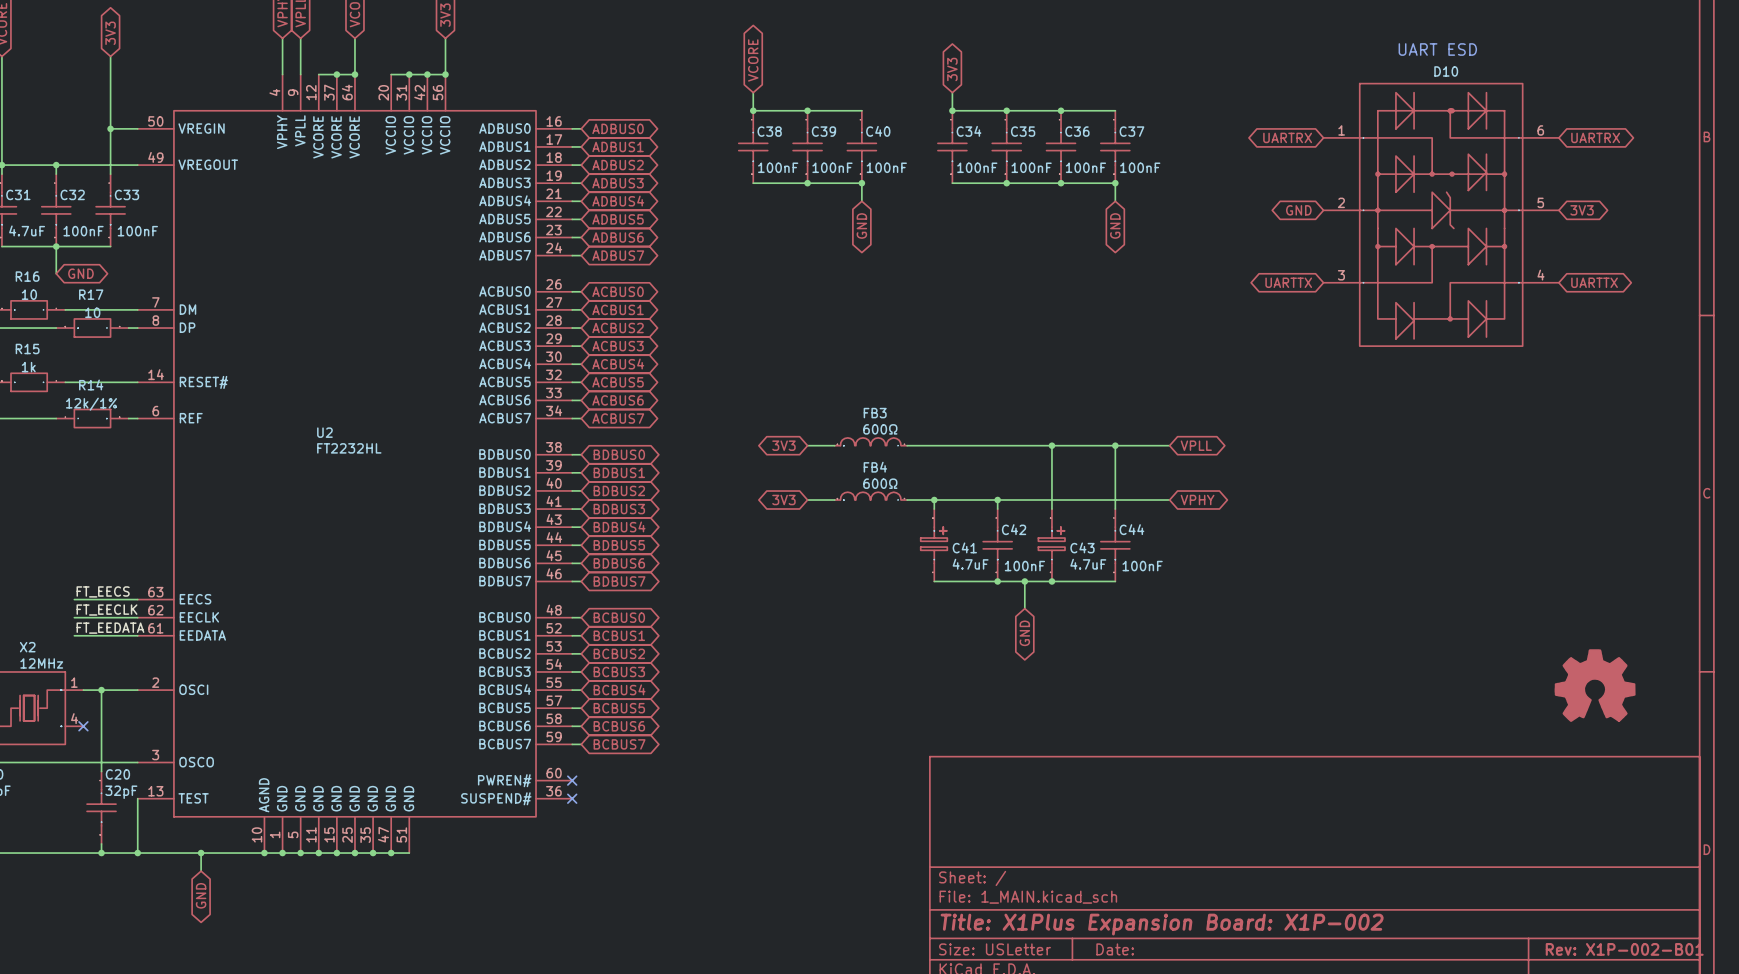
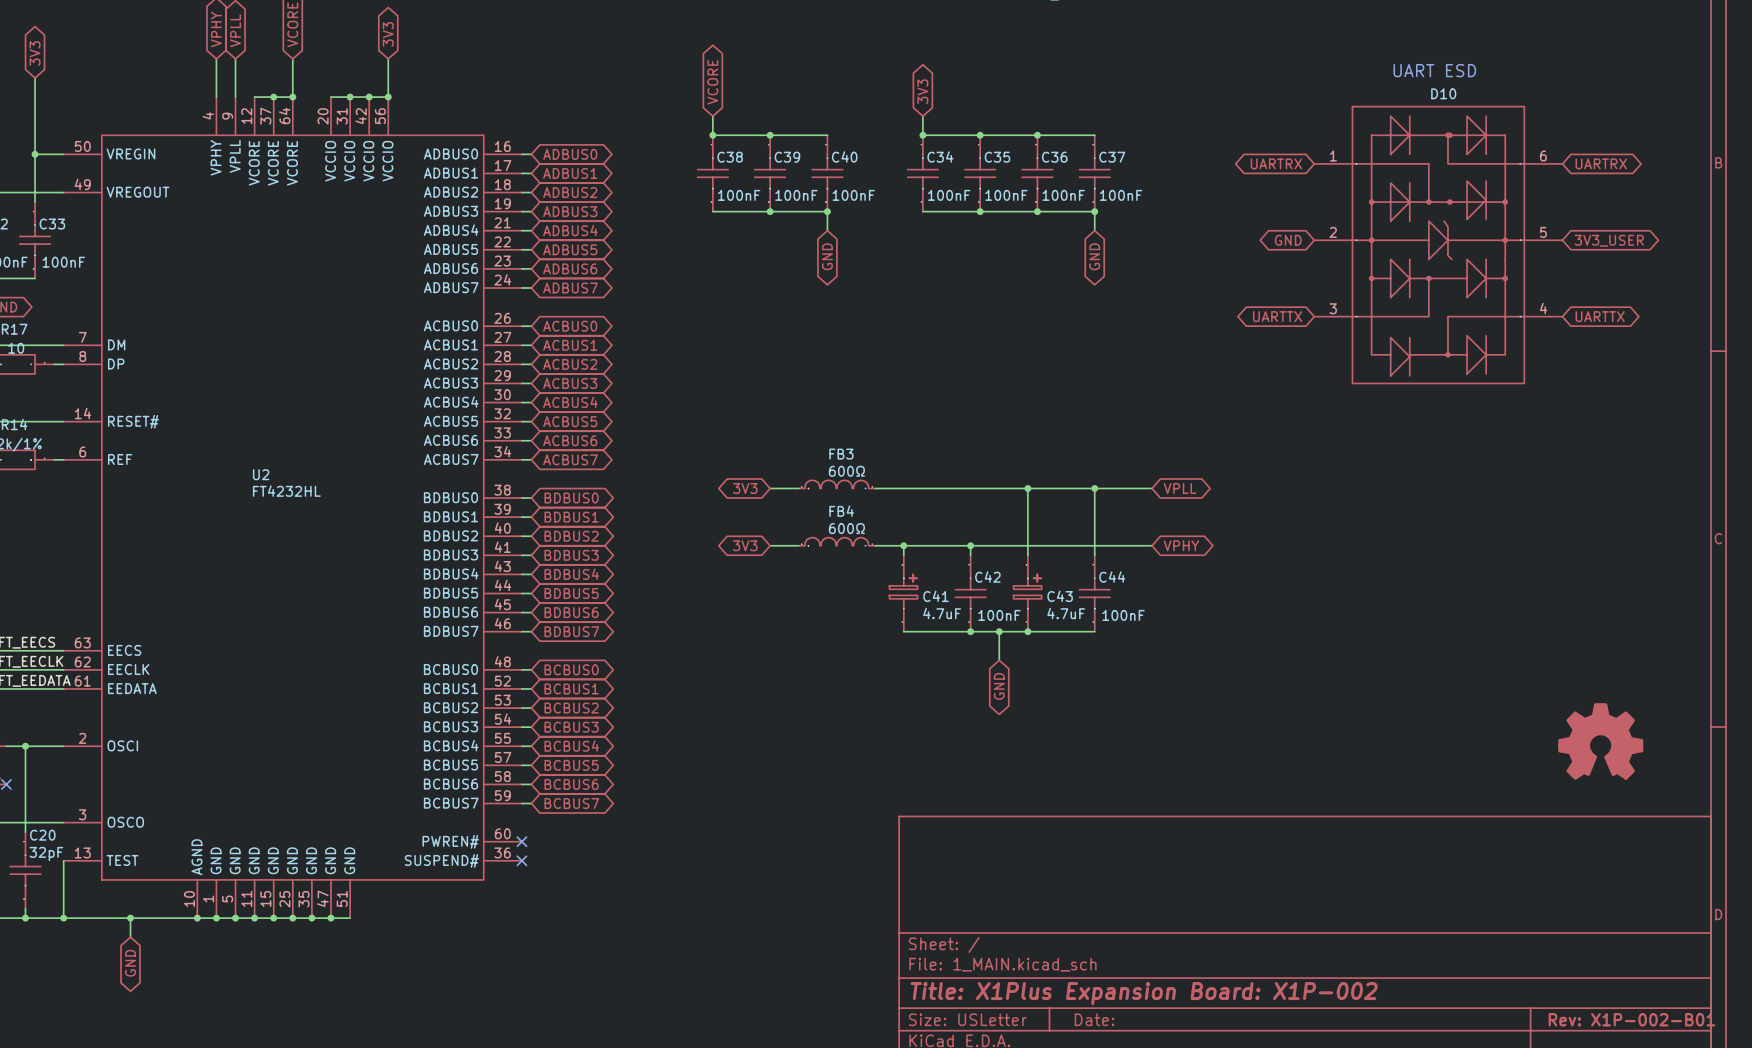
global label: 3V3 (1582, 210) -> 3V3_USER (1609, 240)
U2 value: FT2232HL (349, 448) -> FT4232HL (286, 491)

